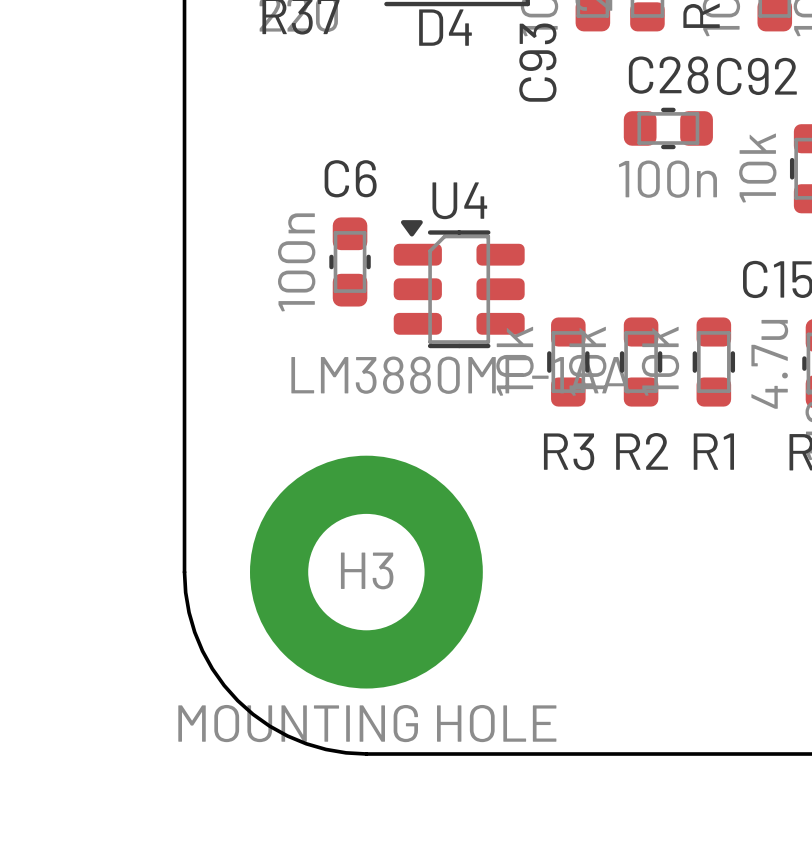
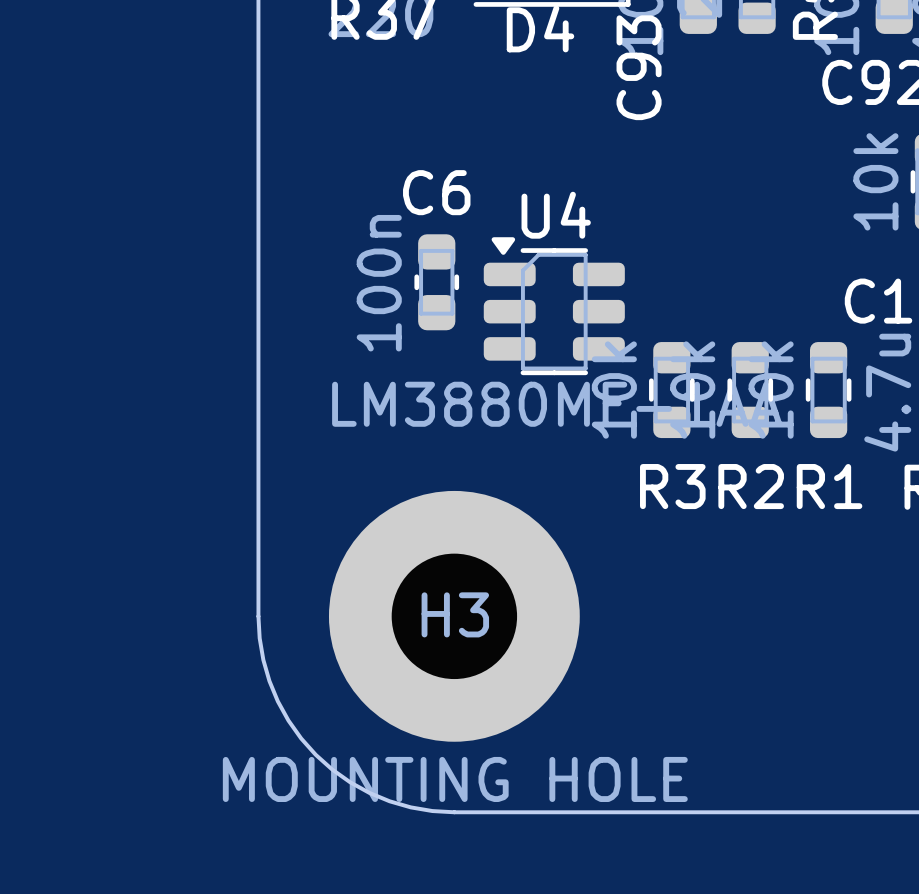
C28: 100n (668, 128) -> none

